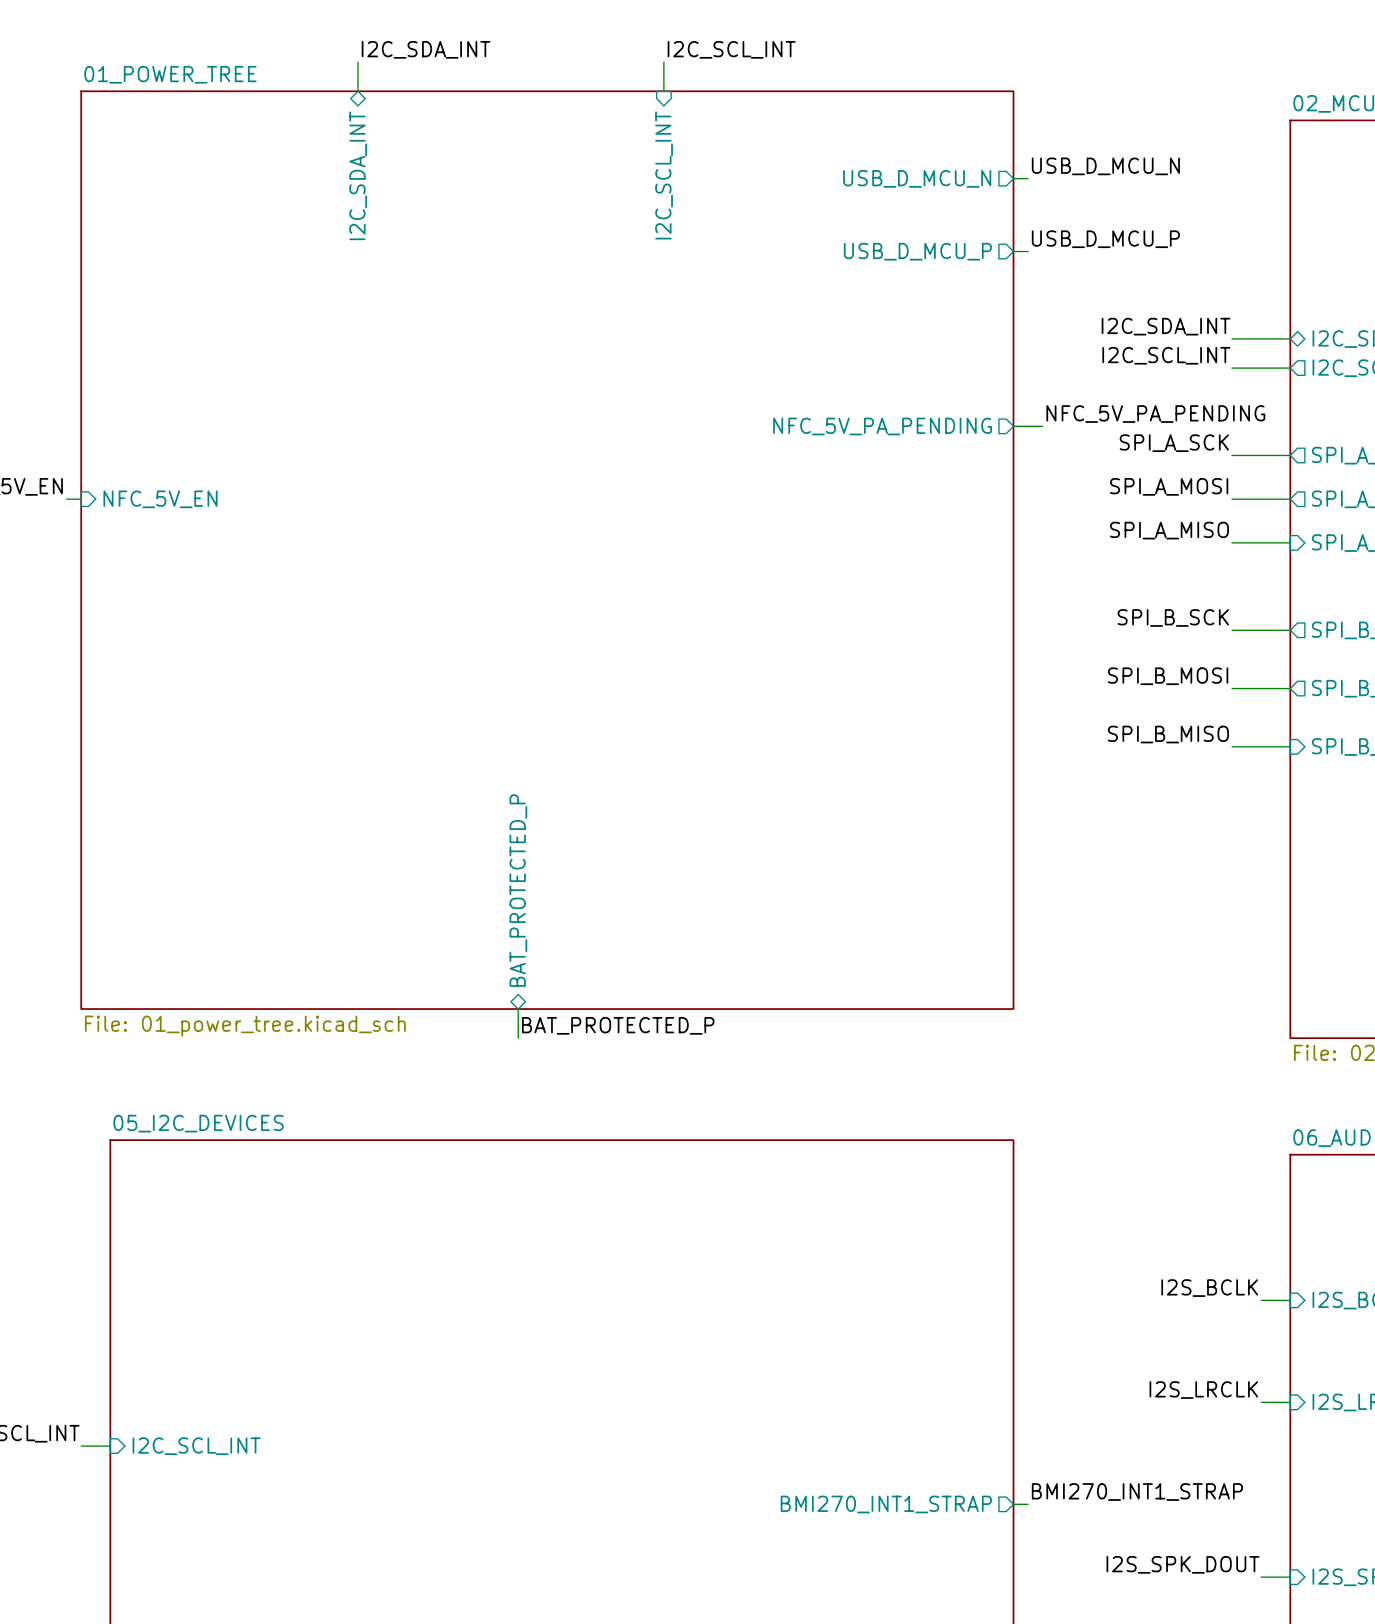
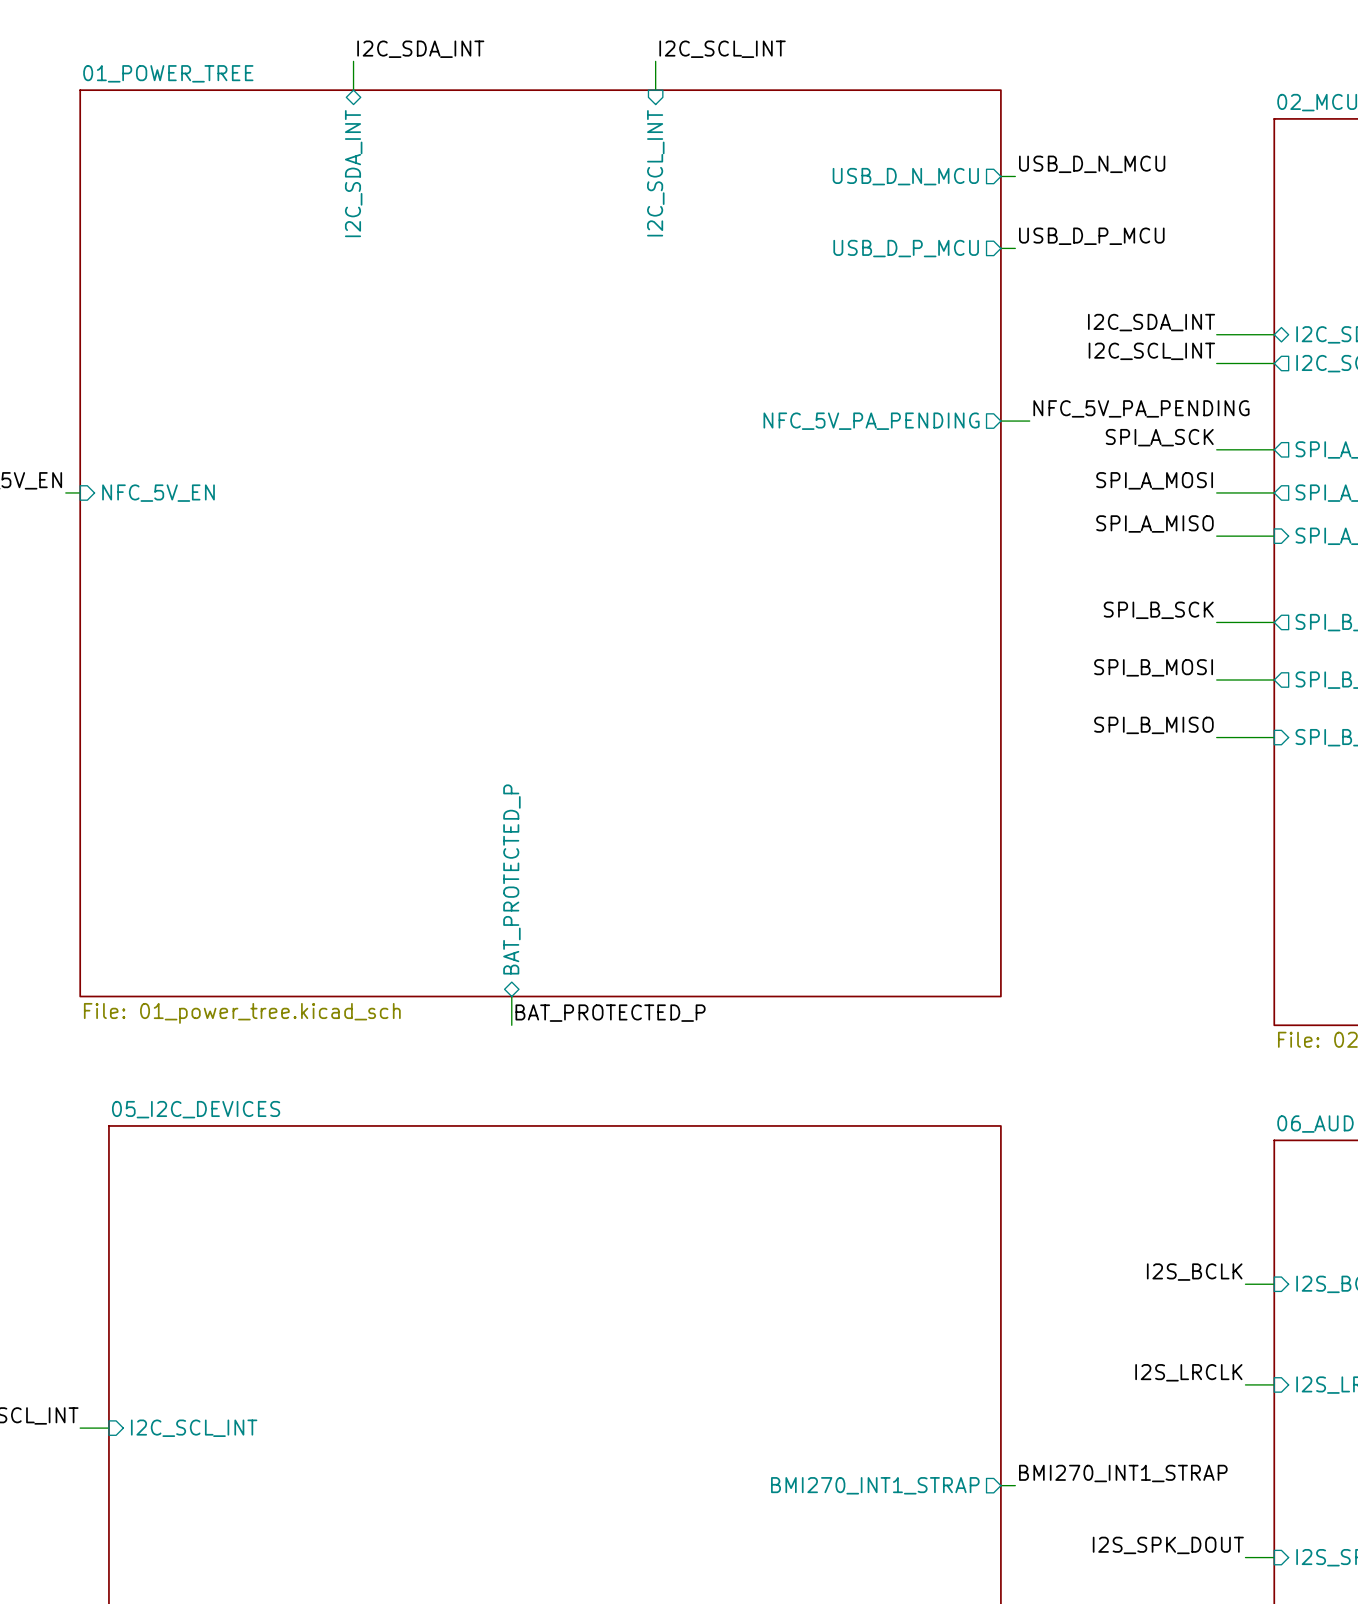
label: USB_D_MCU_N (1105, 166) -> USB_D_N_MCU (1092, 164)
sheet pin: USB_D_MCU_N (917, 178) -> USB_D_N_MCU (905, 176)
label: USB_D_MCU_P (1105, 239) -> USB_D_P_MCU (1091, 236)
sheet pin: USB_D_MCU_P (917, 251) -> USB_D_P_MCU (906, 248)

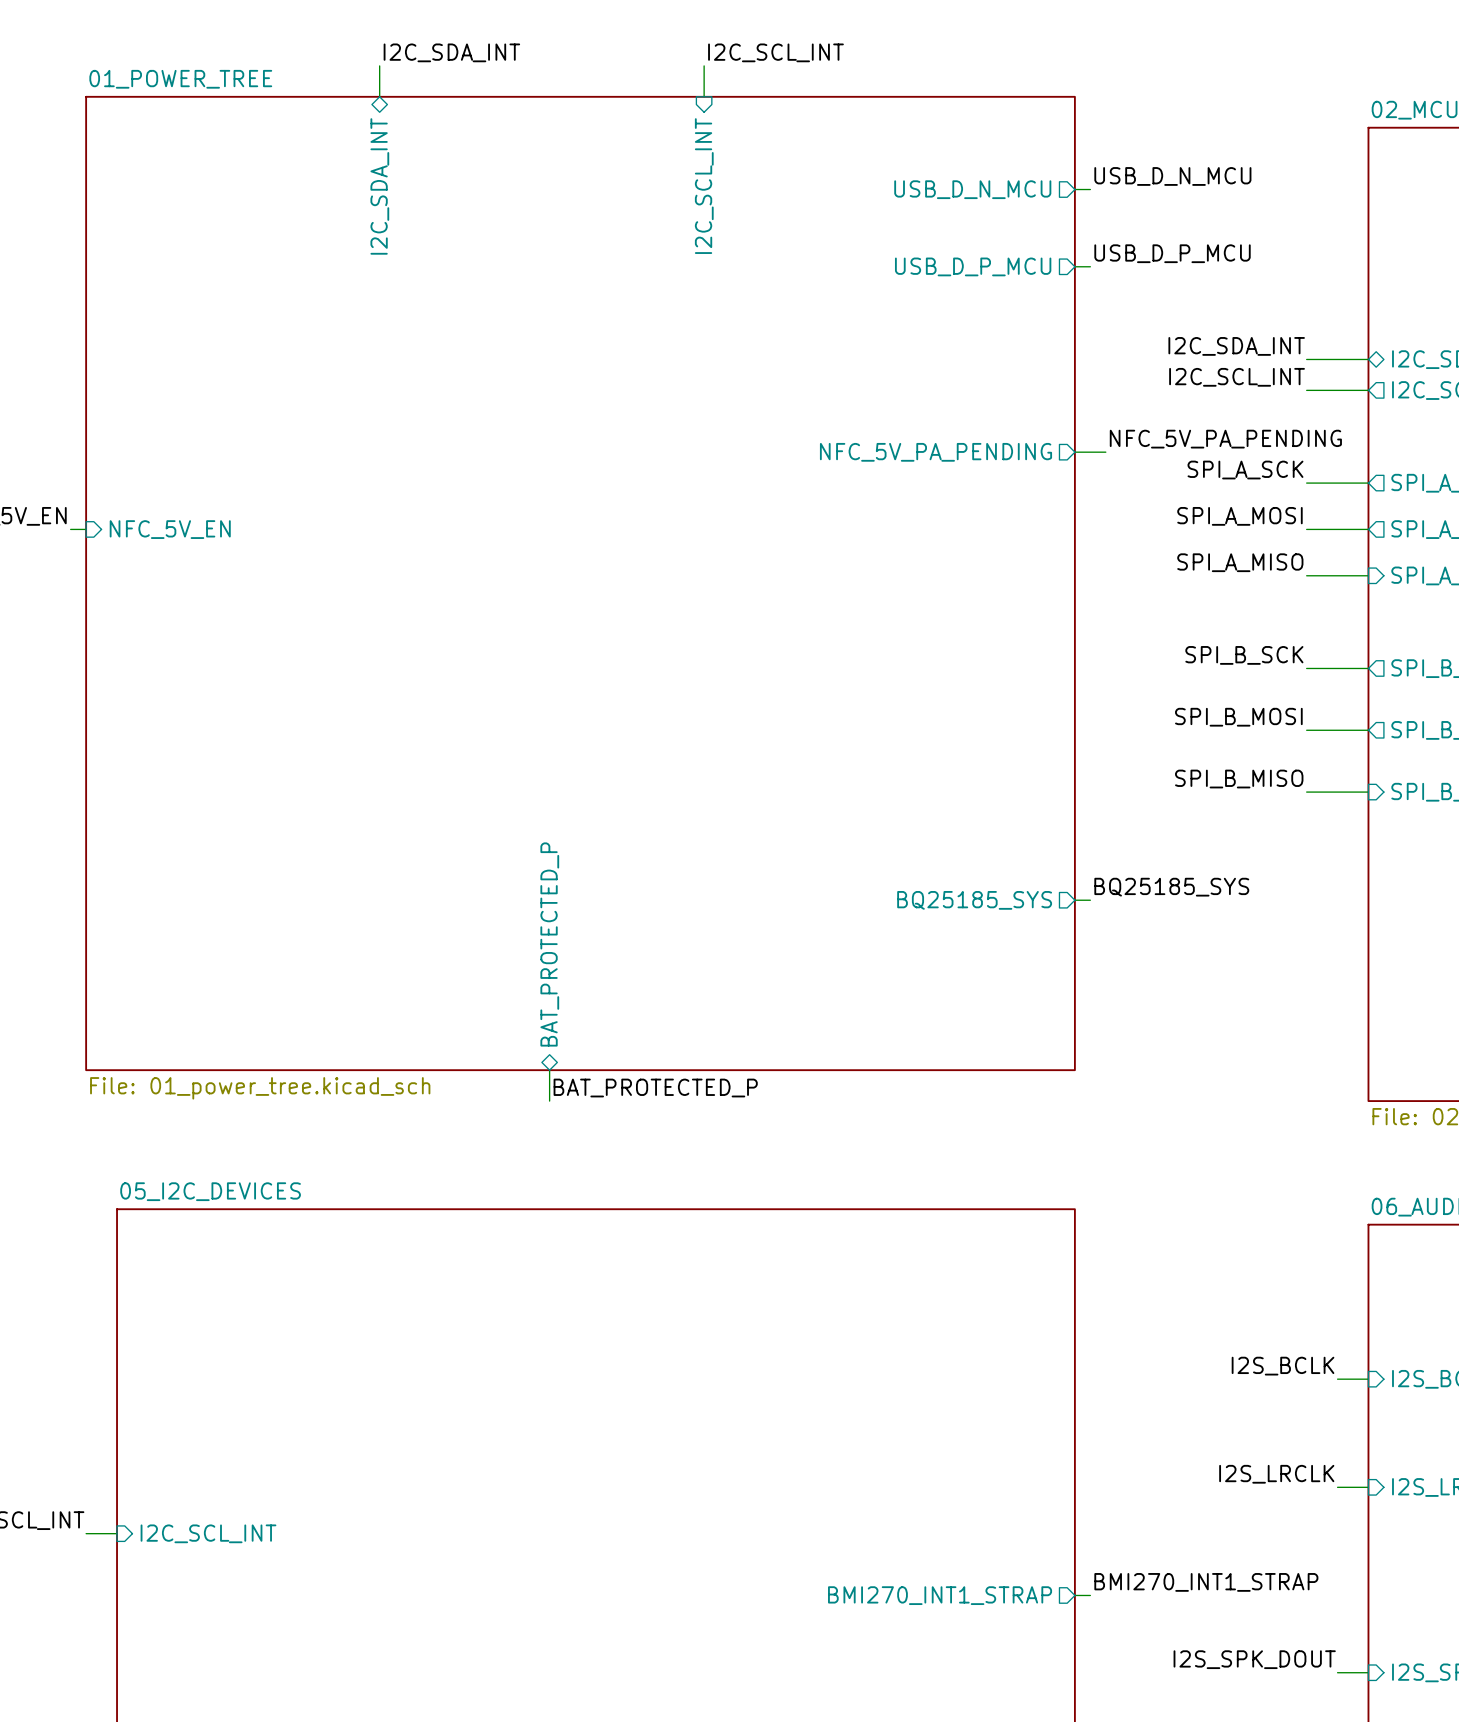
label: none -> BQ25185_SYS (1171, 887)
sheet pin: none -> BQ25185_SYS (974, 900)
wire: none -> (1074, 900) (1090, 900)

